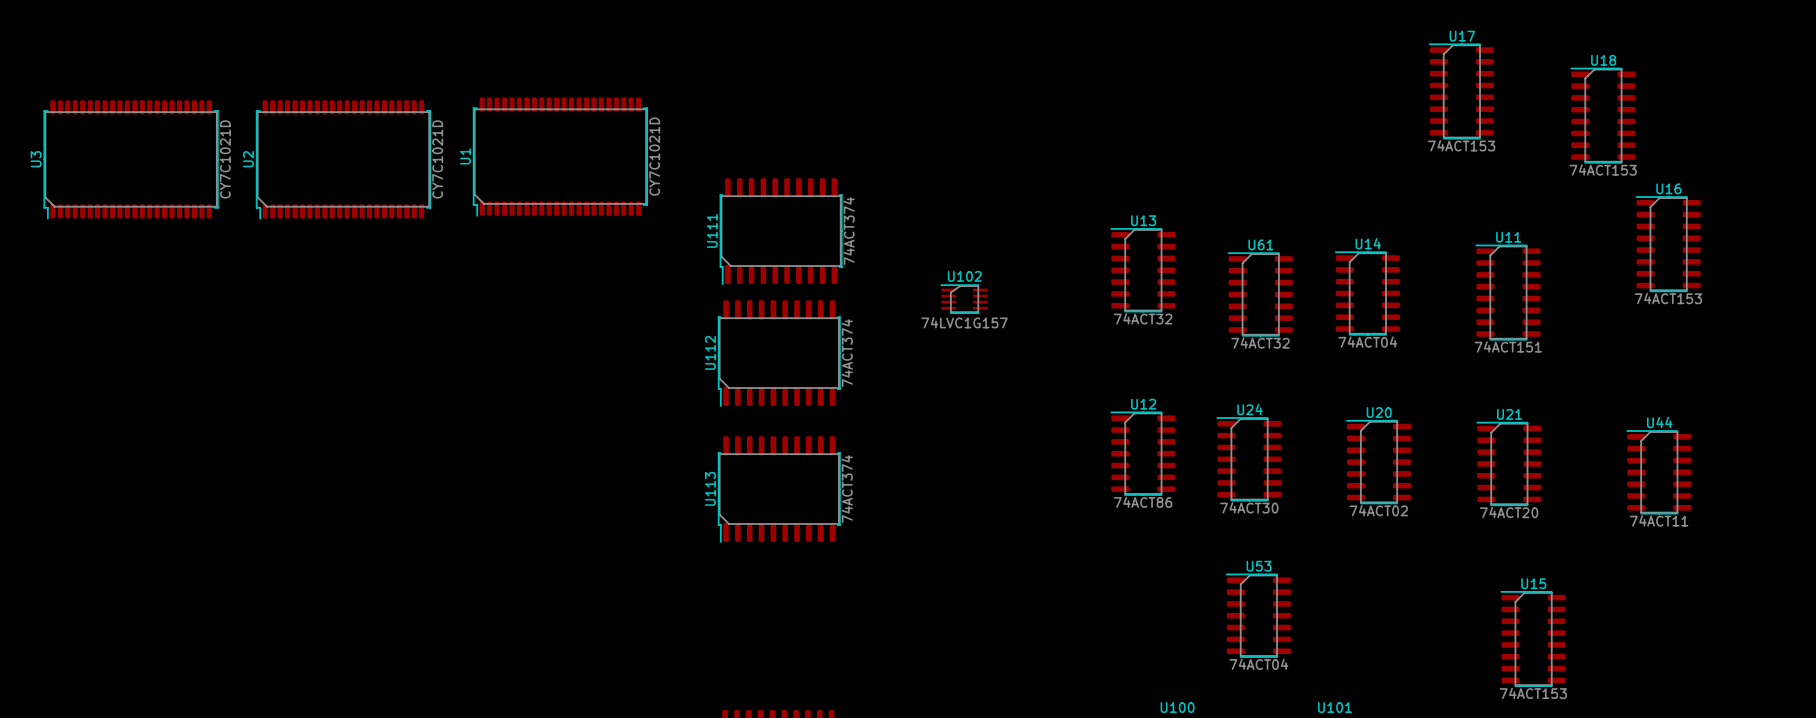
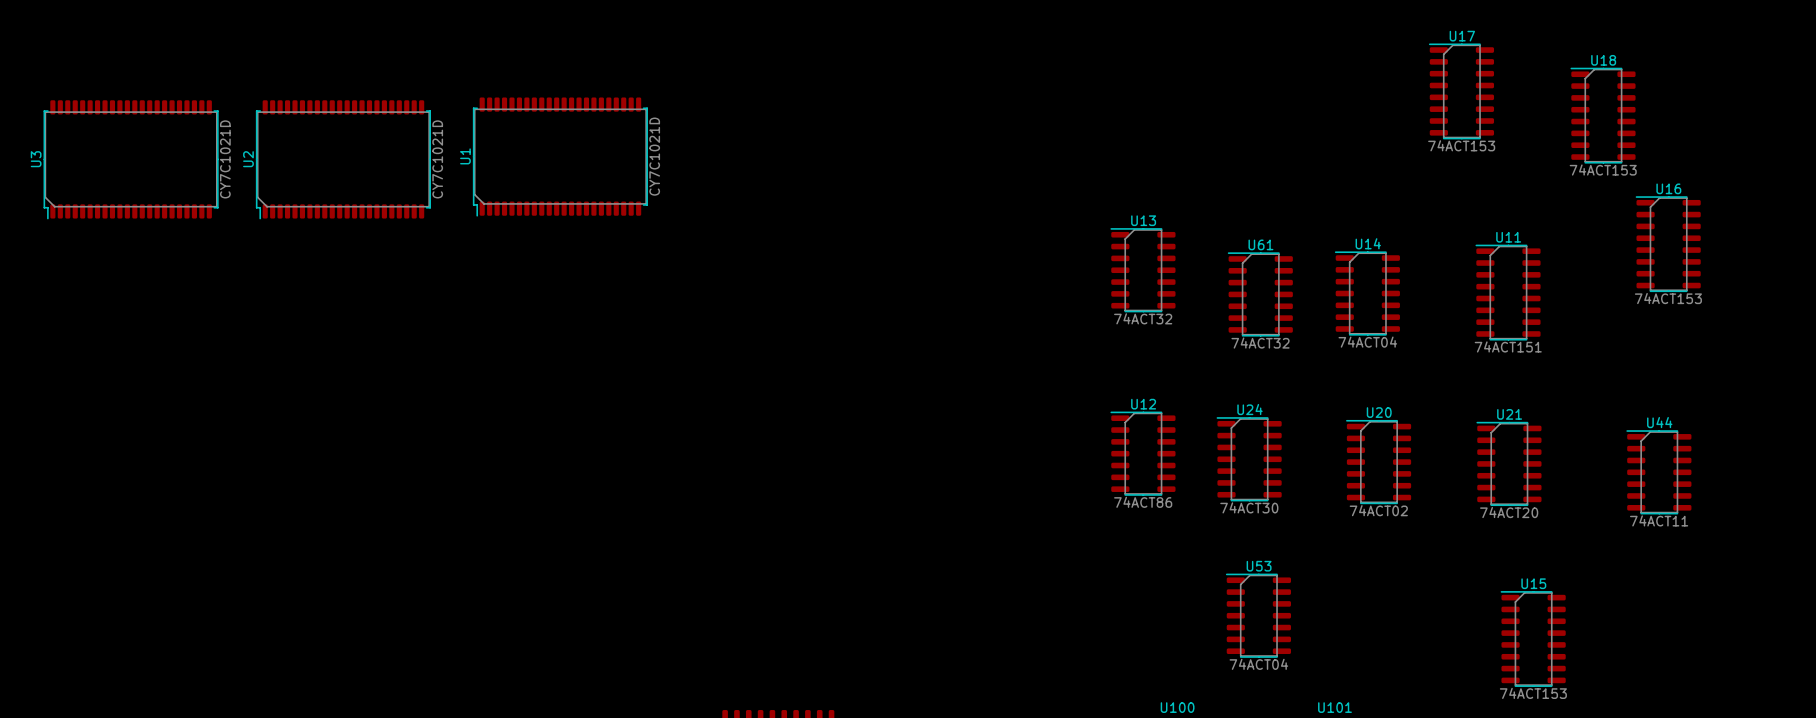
U111: 74ACT374 (781, 231) -> none
U102: 74LVC1G157 (964, 299) -> none
U112: 74ACT374 (779, 353) -> none
U113: 74ACT374 (779, 489) -> none

